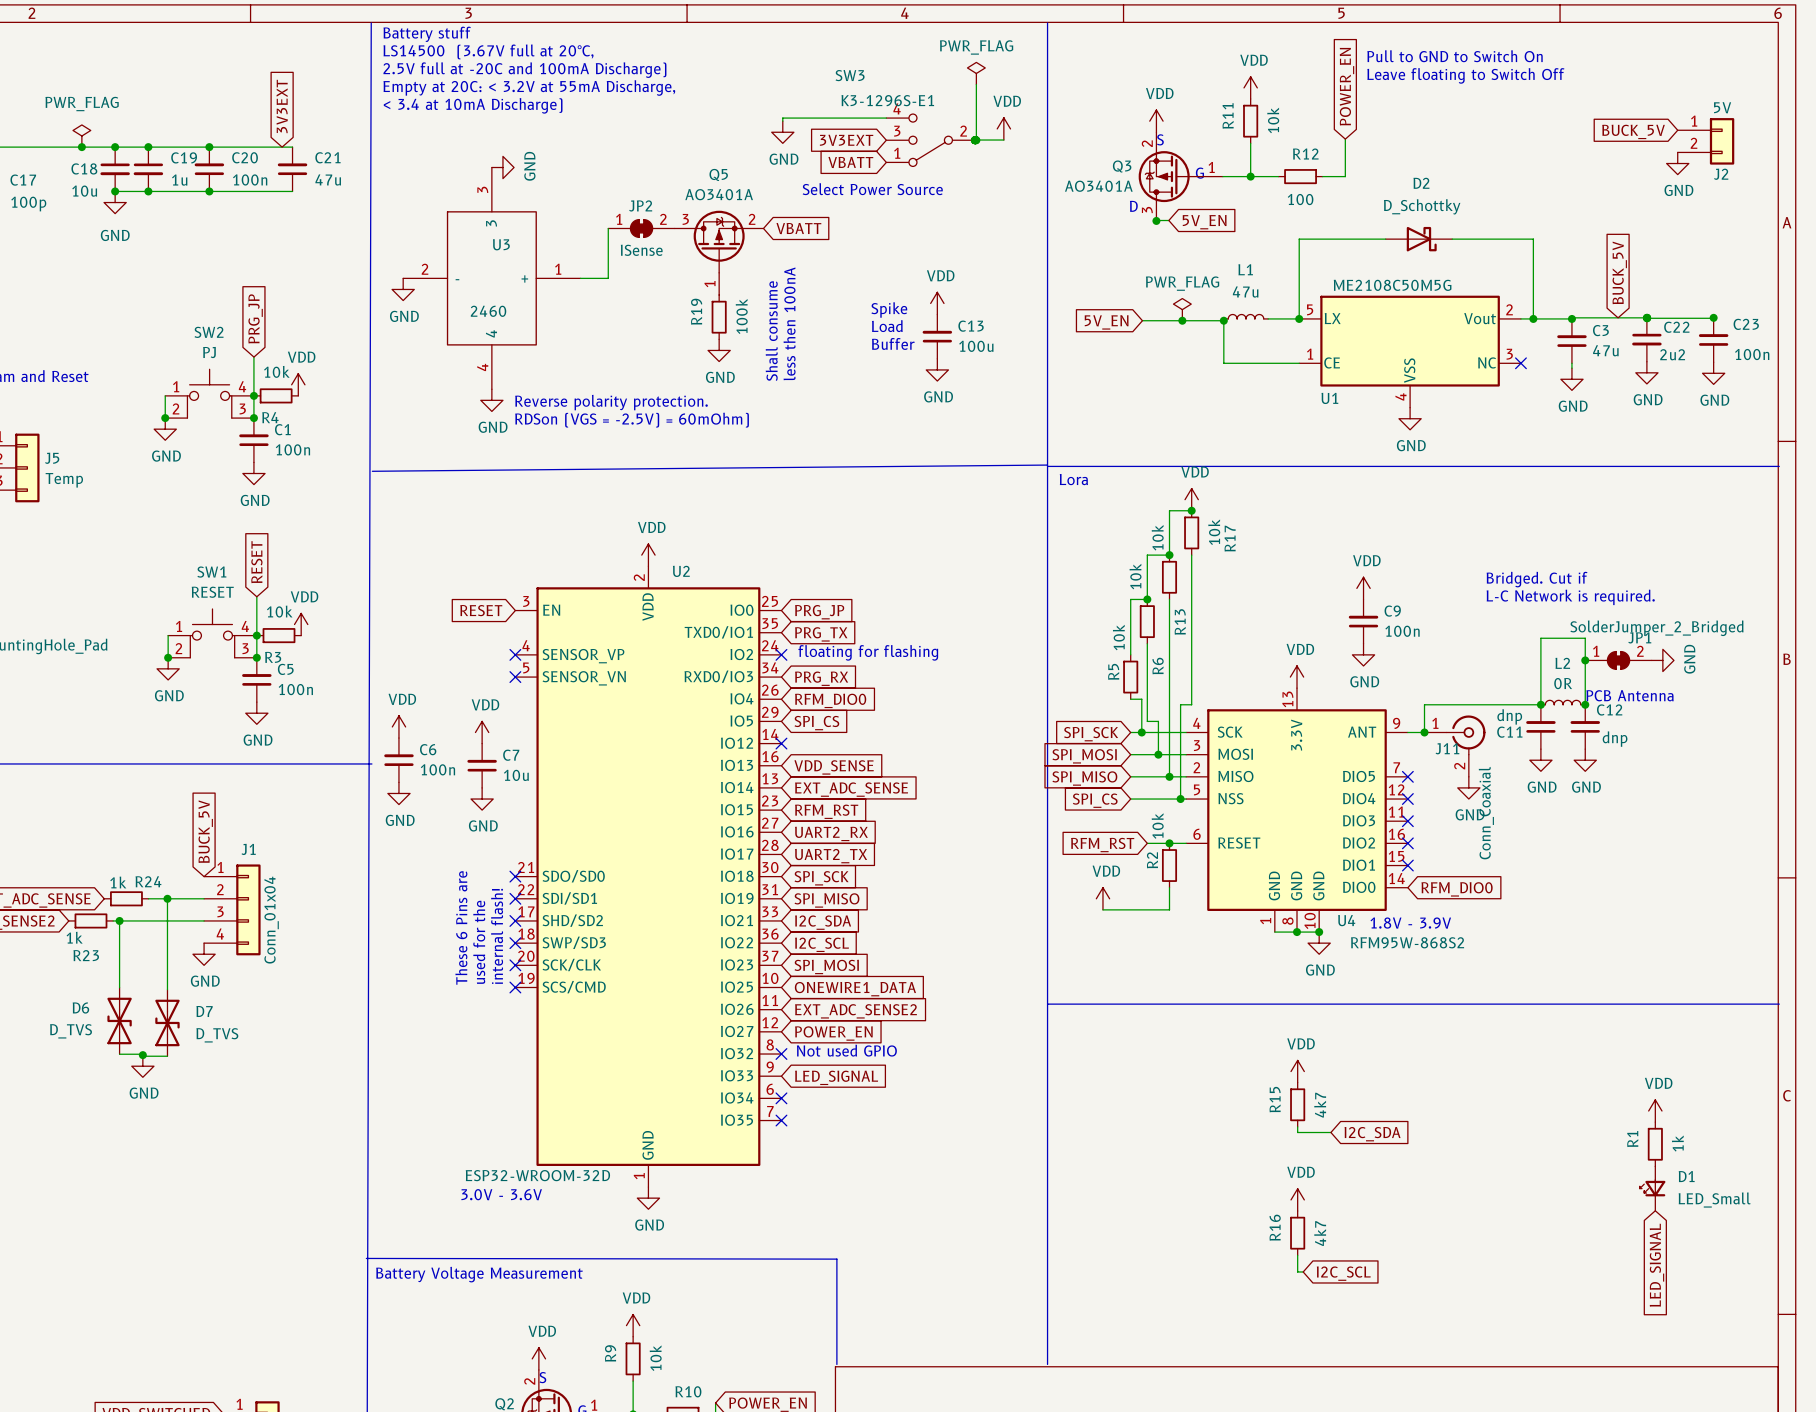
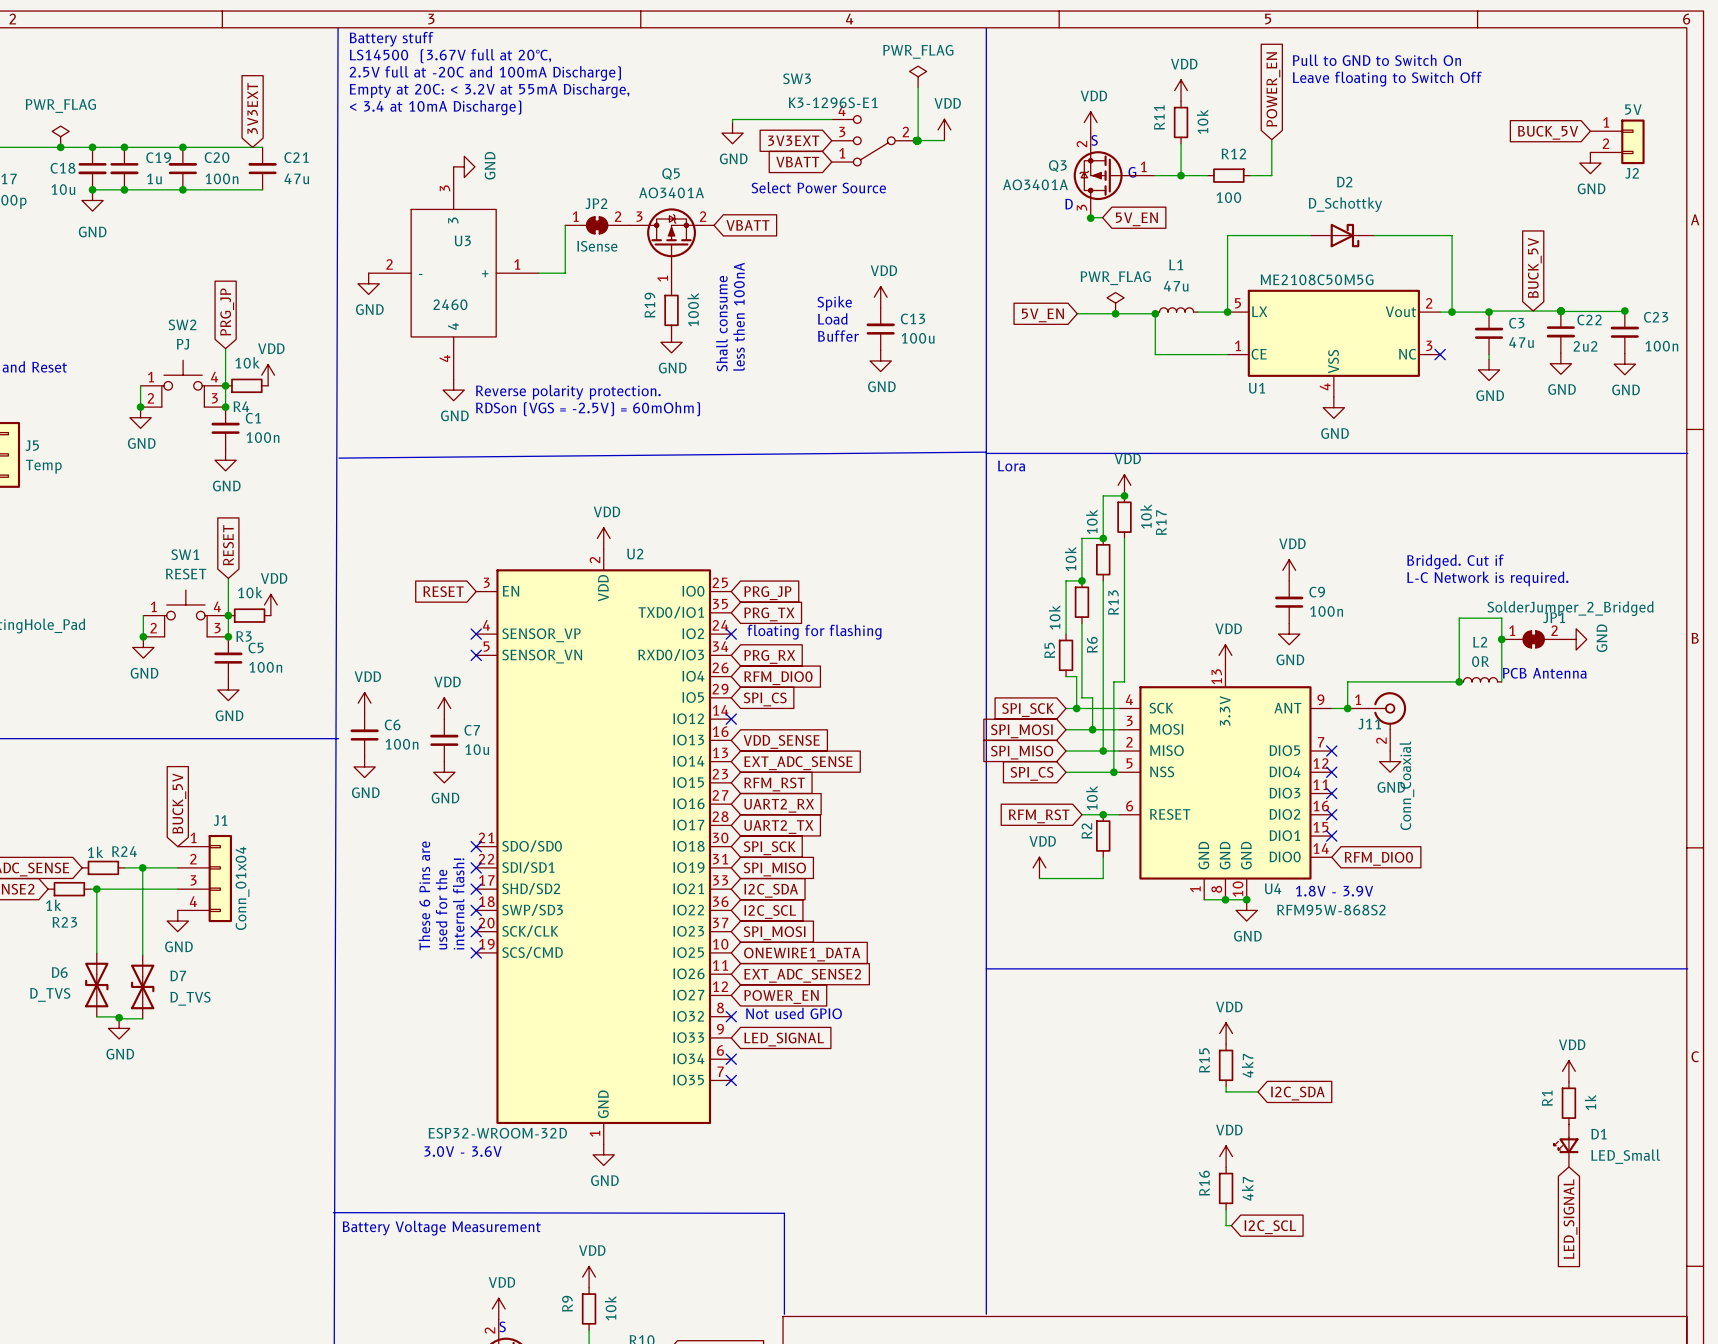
junction: (1585, 704) -> none
C11: dnp (1540, 726) -> none
C12: dnp (1585, 726) -> none
power symbol: GND (1540, 760) -> none
power symbol: GND (1585, 760) -> none

